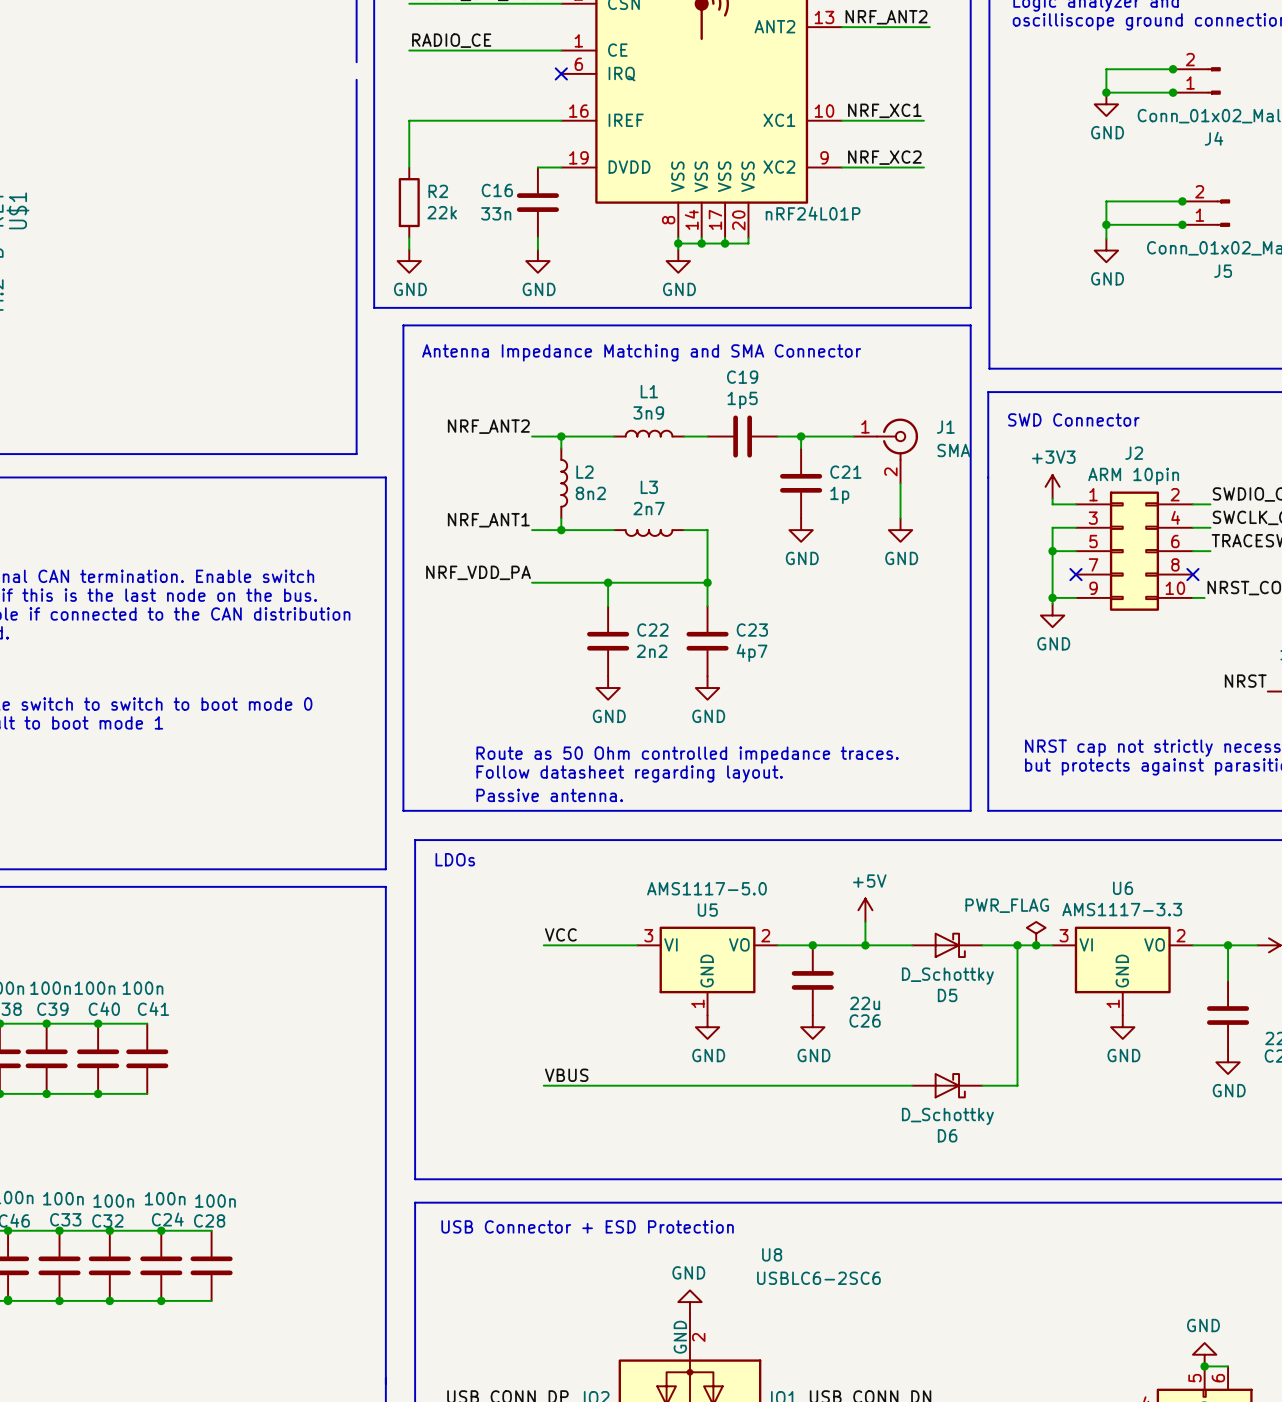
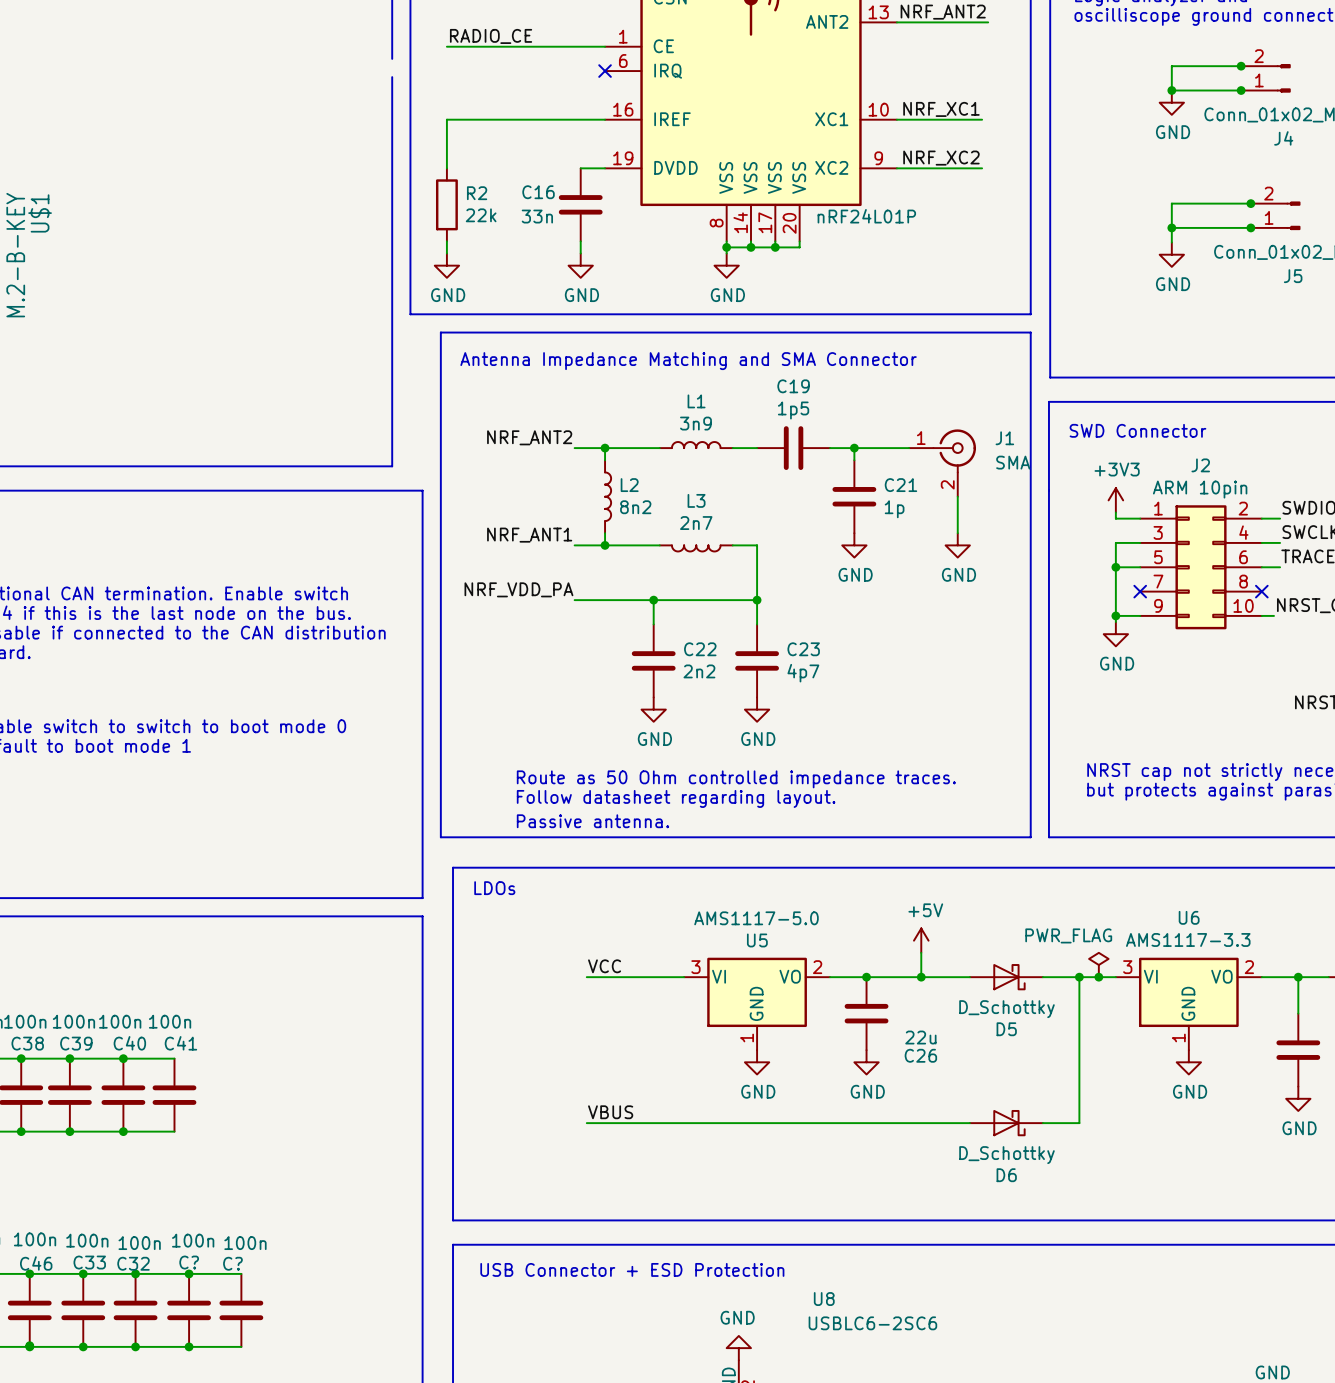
C24 name: C24 (167, 1219) -> C? (189, 1262)
C28 name: C28 (209, 1220) -> C? (232, 1263)

